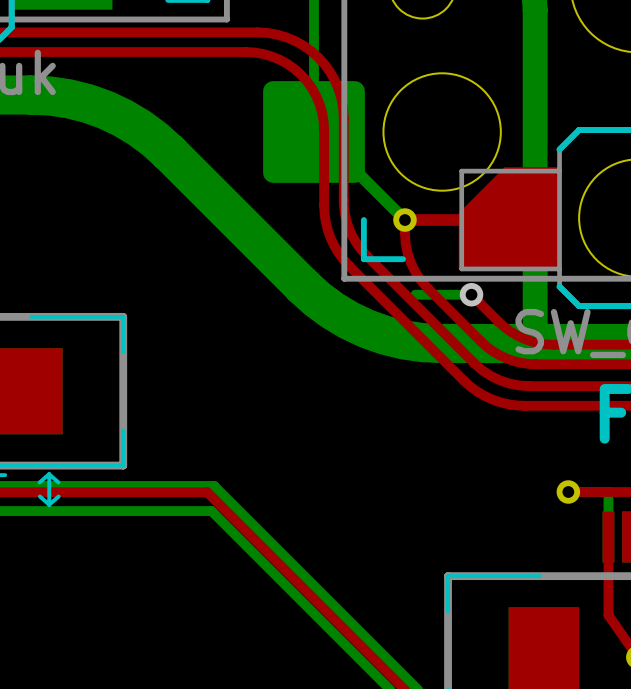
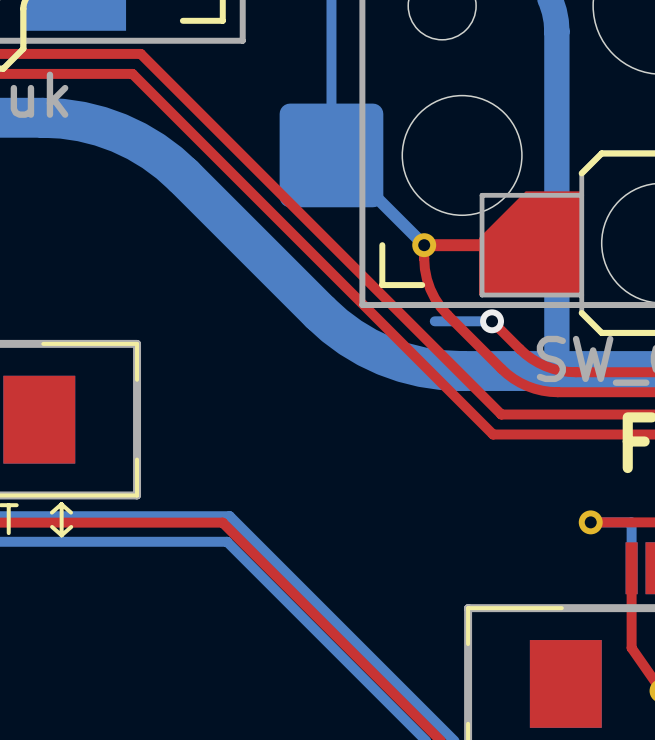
top track: (126, 32) (267, 32) (286, 37) (311, 51) (330, 72) (341, 99) (343, 118) (344, 208) (347, 223) (356, 243) (481, 369) (499, 380) (529, 386) -> (140, 53) (501, 414) (551, 414)
top track: (118, 52) (254, 52) (271, 56) (294, 69) (312, 88) (322, 112) (324, 130) (324, 213) (330, 238) (338, 253) (349, 266) (470, 386) (491, 399) (507, 404) (524, 405) -> (132, 73) (493, 434) (546, 434)

